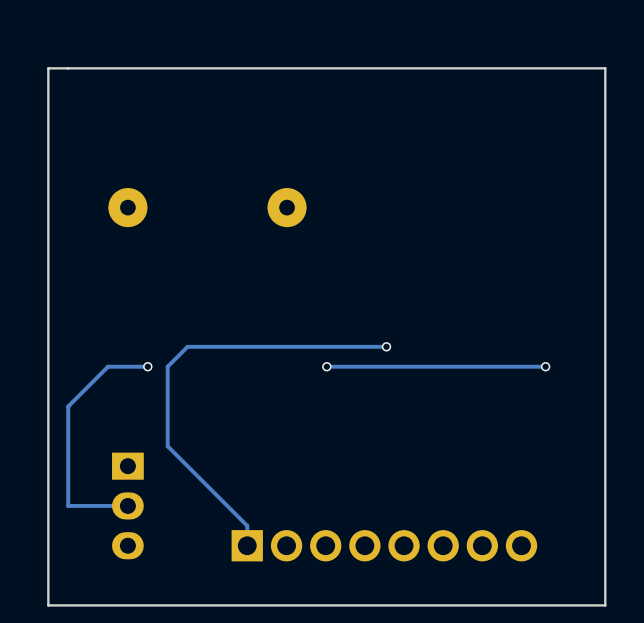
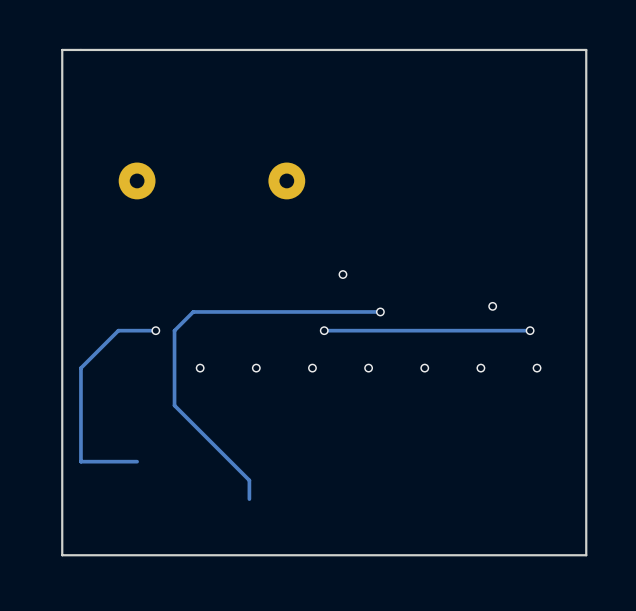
via: none -> (342, 274)
via: none -> (492, 306)
via: none -> (200, 368)
via: none -> (256, 368)
via: none -> (312, 368)
via: none -> (368, 368)
via: none -> (424, 368)
via: none -> (480, 368)
via: none -> (537, 368)
part: (127, 505) -> none
part: (384, 545) -> none

